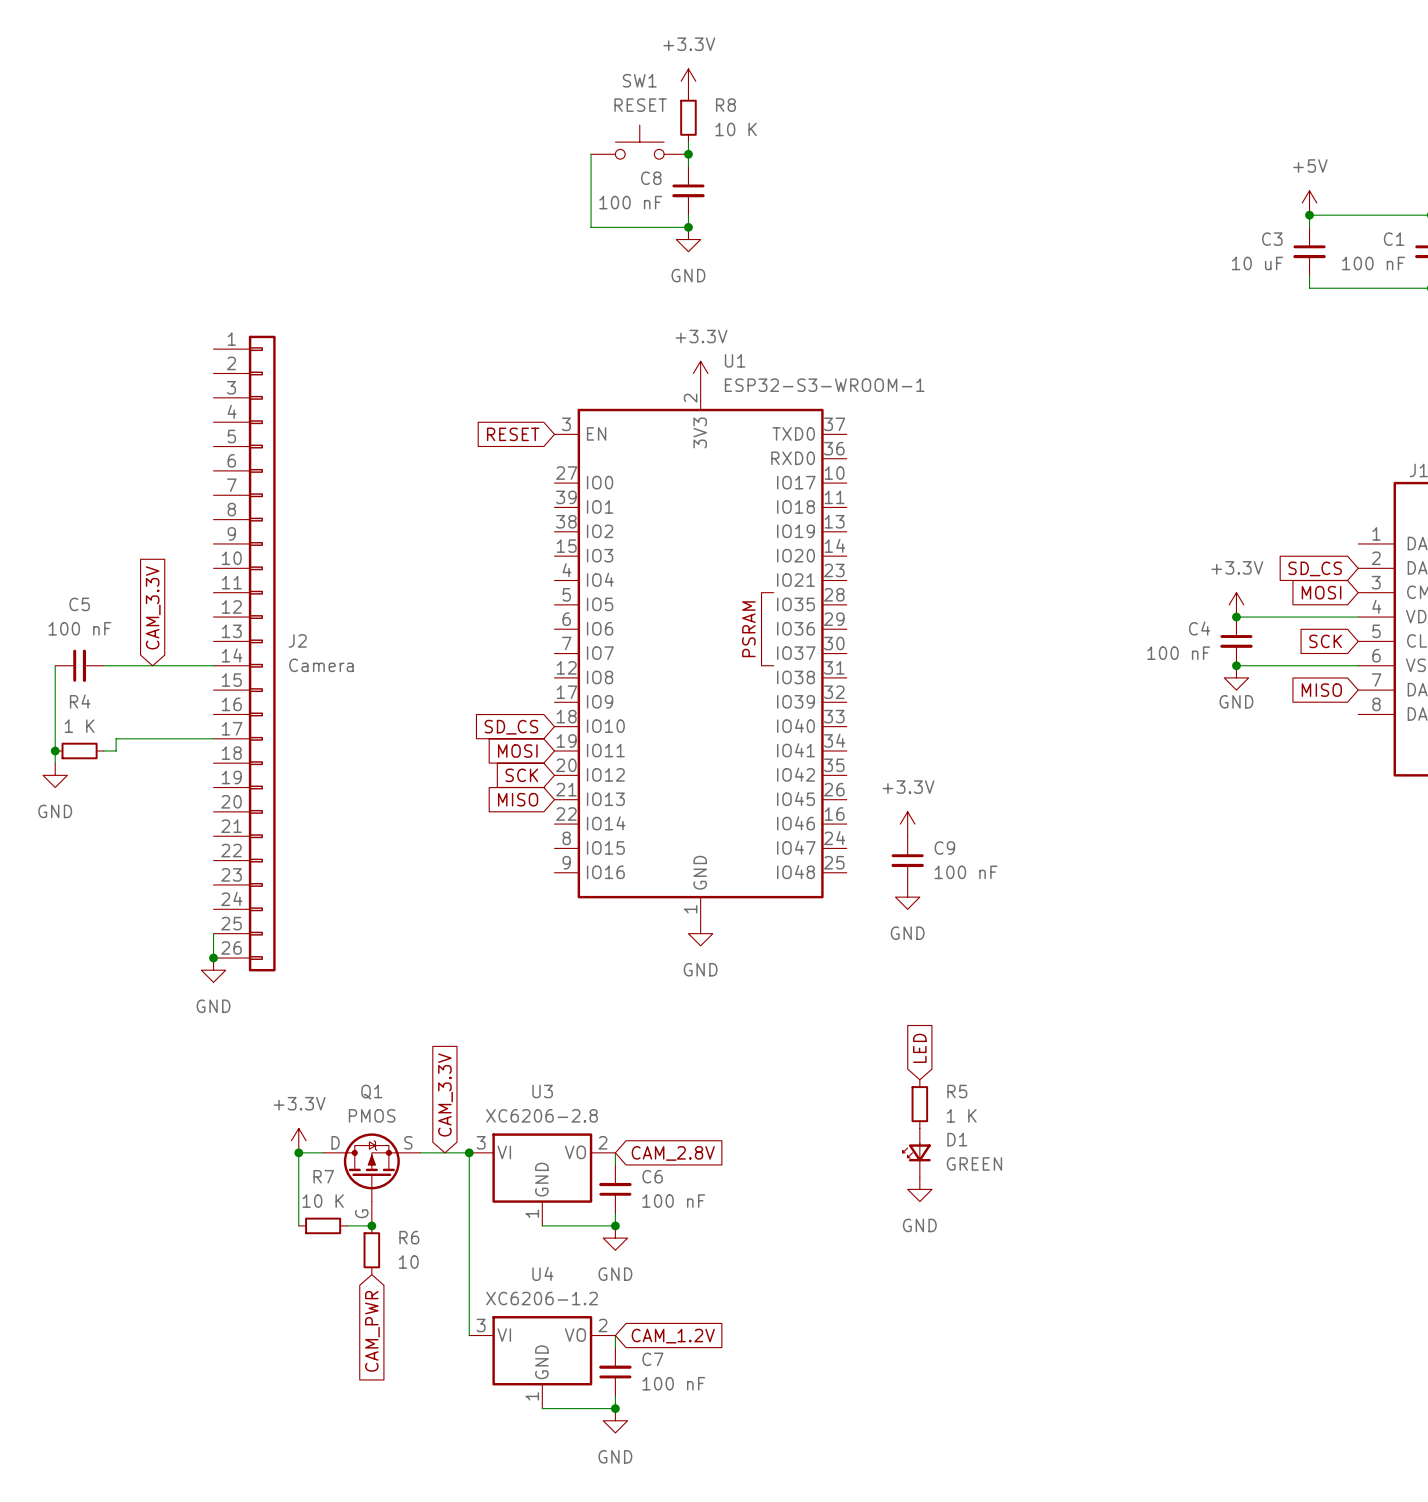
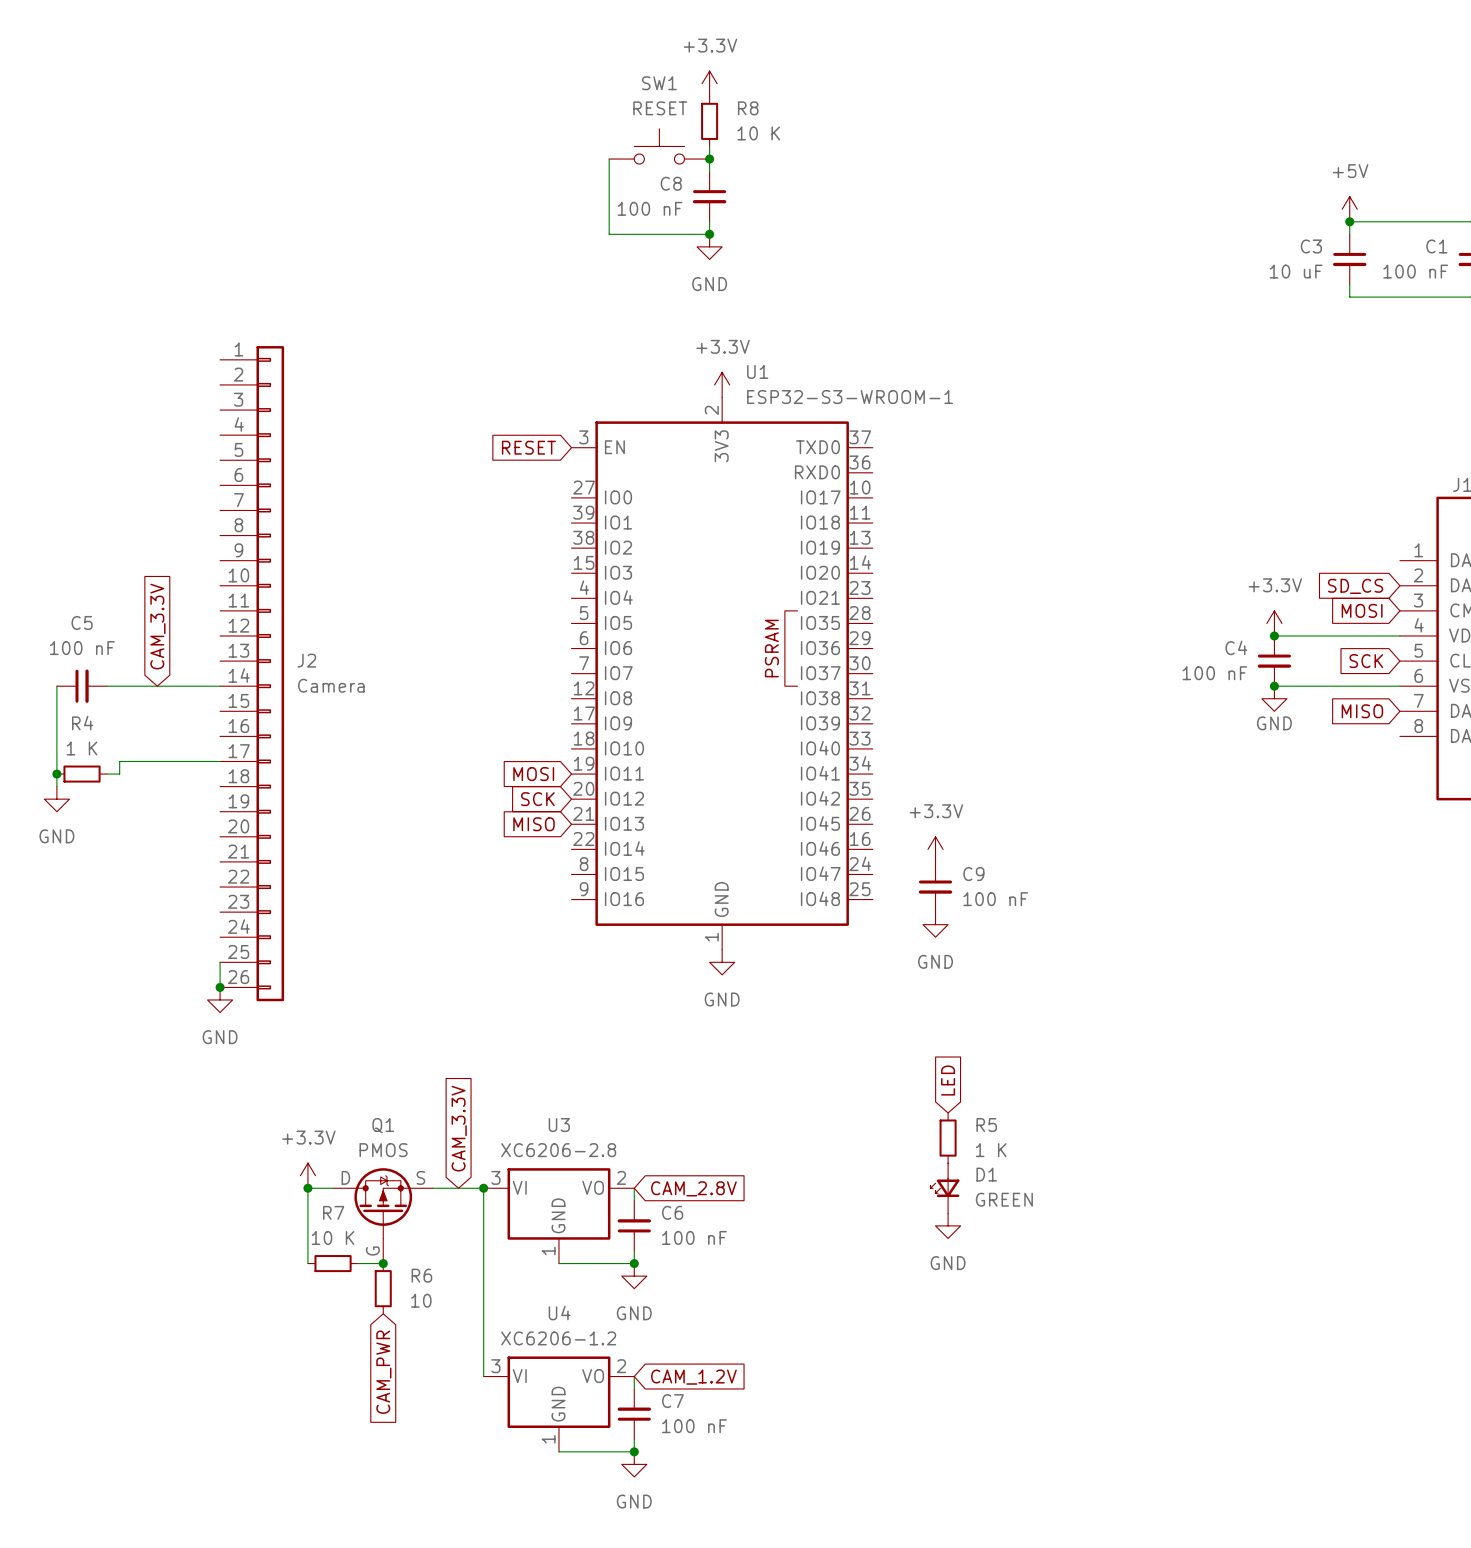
global label: SD_CS (511, 727) -> none

